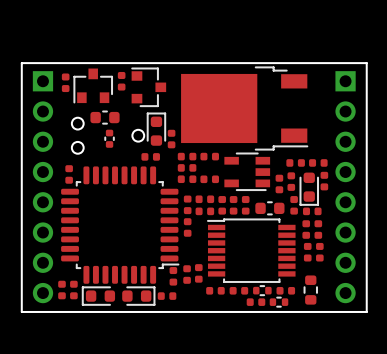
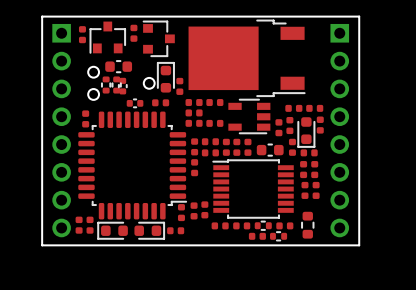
part: none -> (106, 85)
part: none -> (116, 85)
part: none -> (135, 103)

